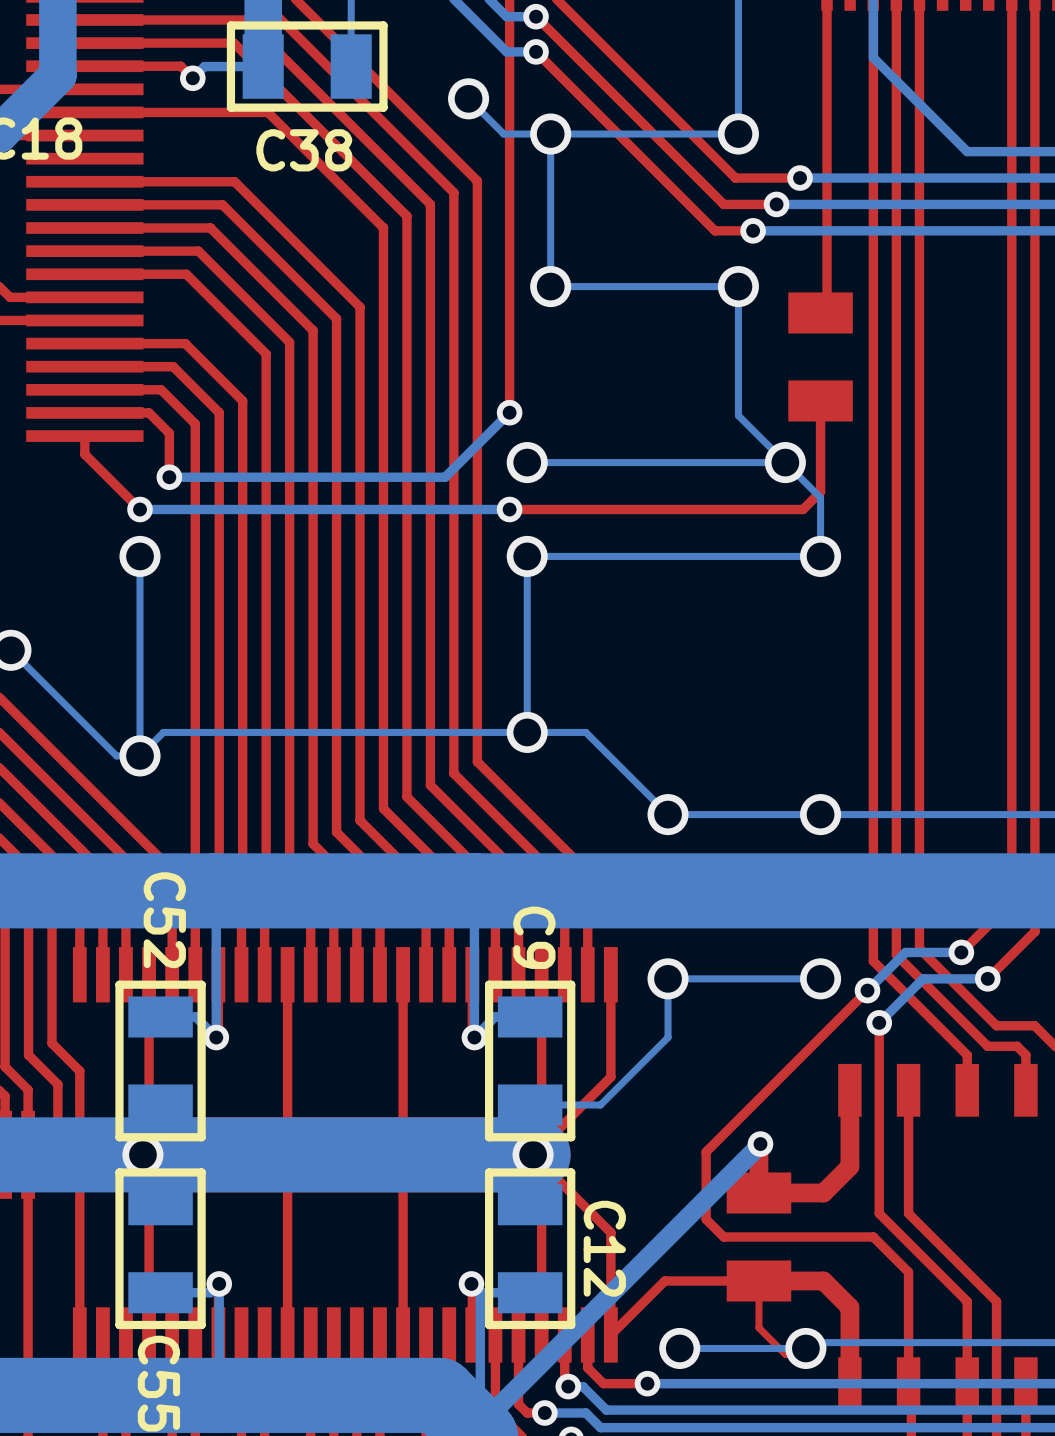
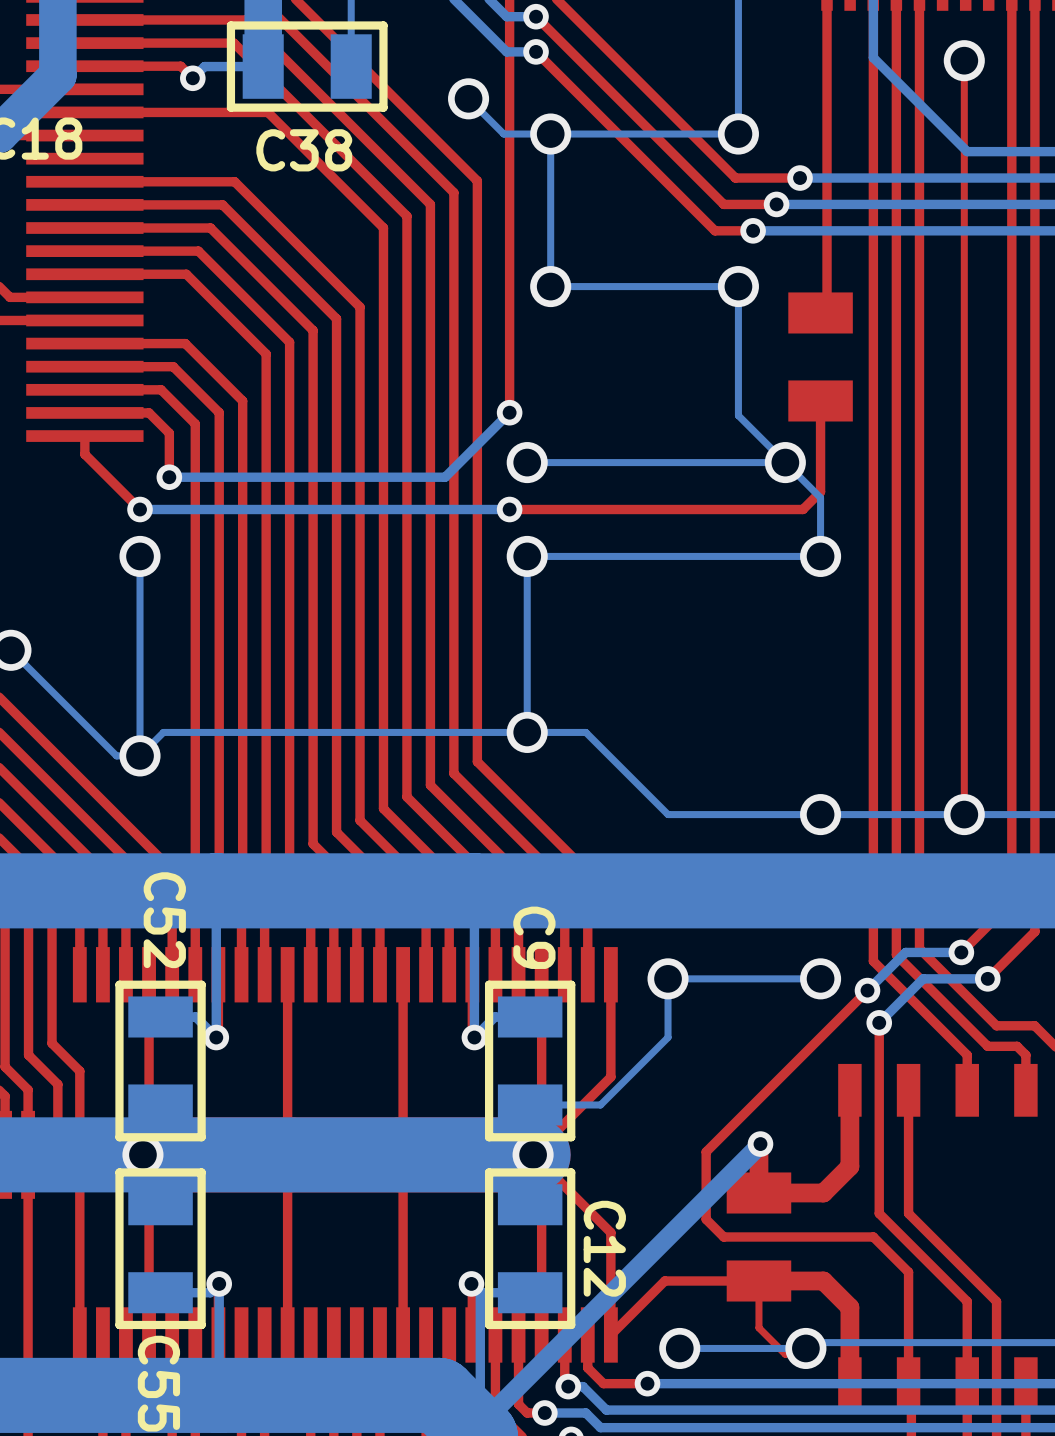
top track: none -> (964, 60) (964, 814)
via: none -> (964, 60)
via: (668, 814) -> none
via: none -> (964, 814)

